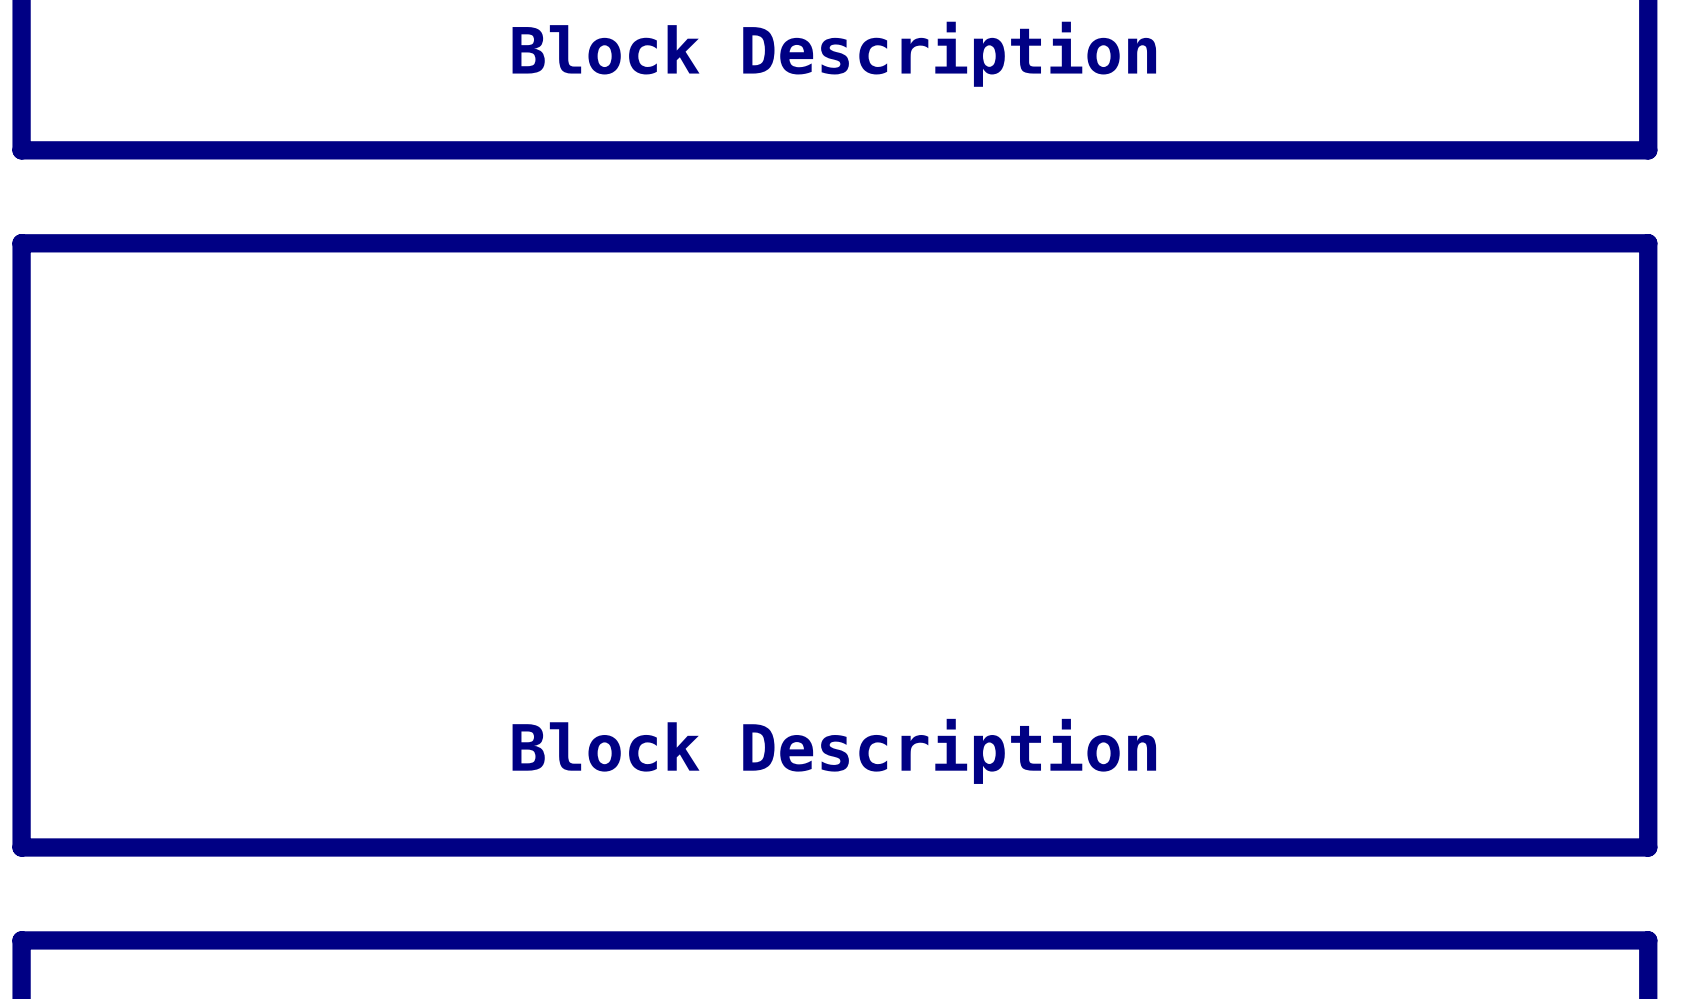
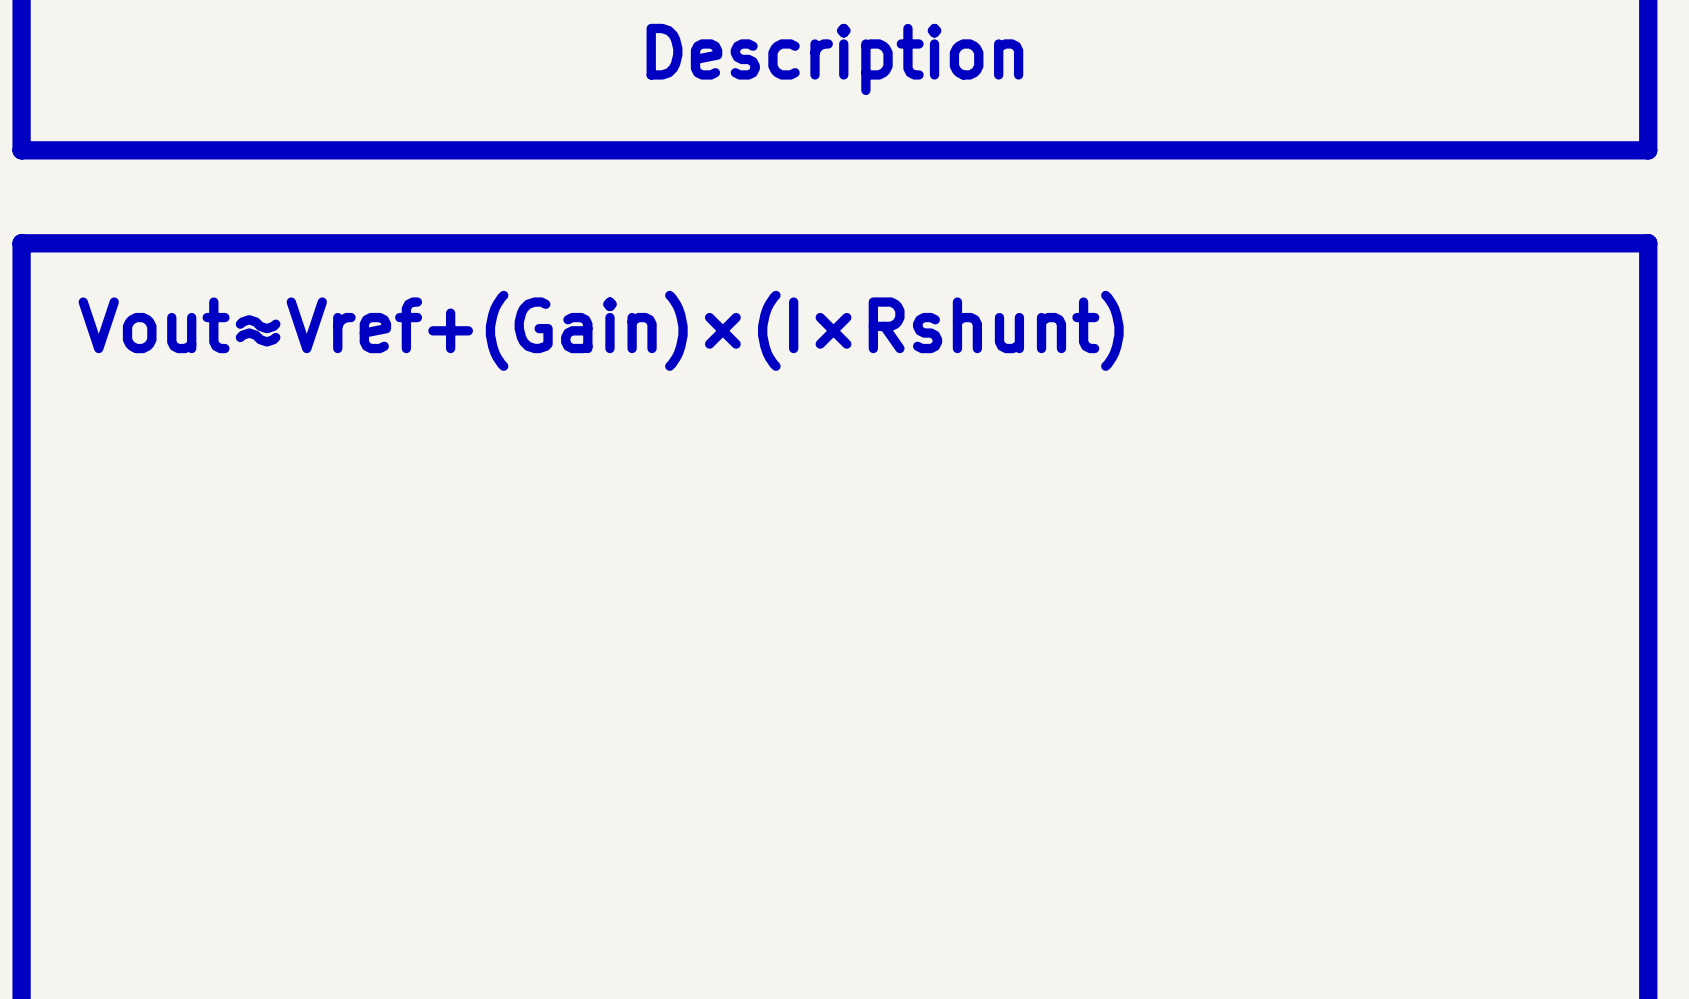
text: Block Description (834, 54) -> Description (834, 59)
text: none -> Vout≈Vref+(Gain)×(I×Rshunt) (601, 330)
text: Block Description (834, 751) -> none
line: (21, 847) (1648, 847) -> (21, 847) (21, 940)
line: (21, 940) (1648, 940) -> (1648, 847) (1648, 940)

